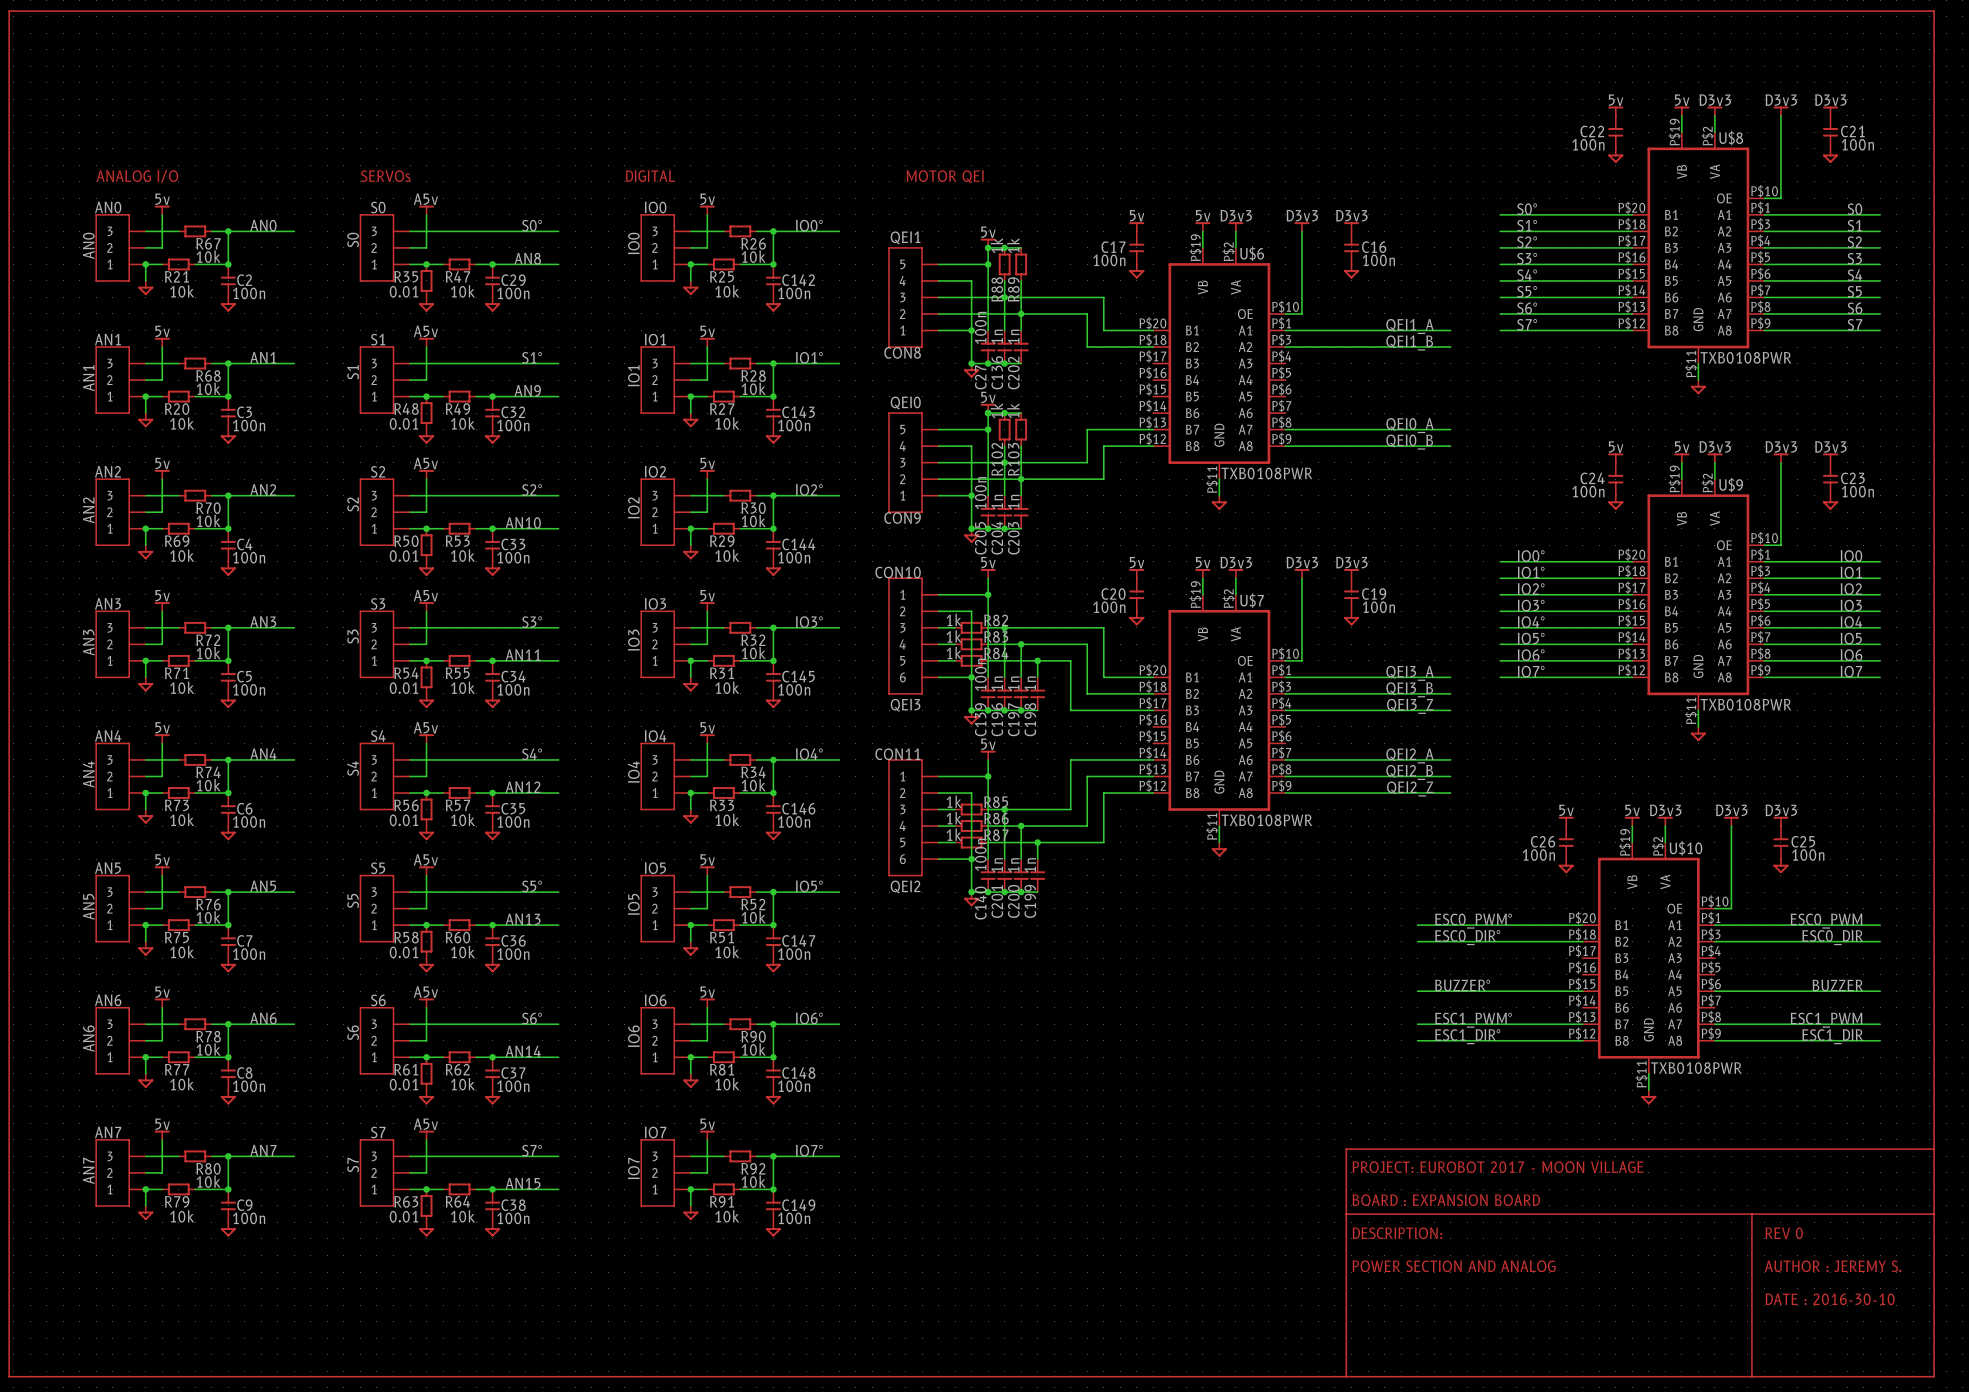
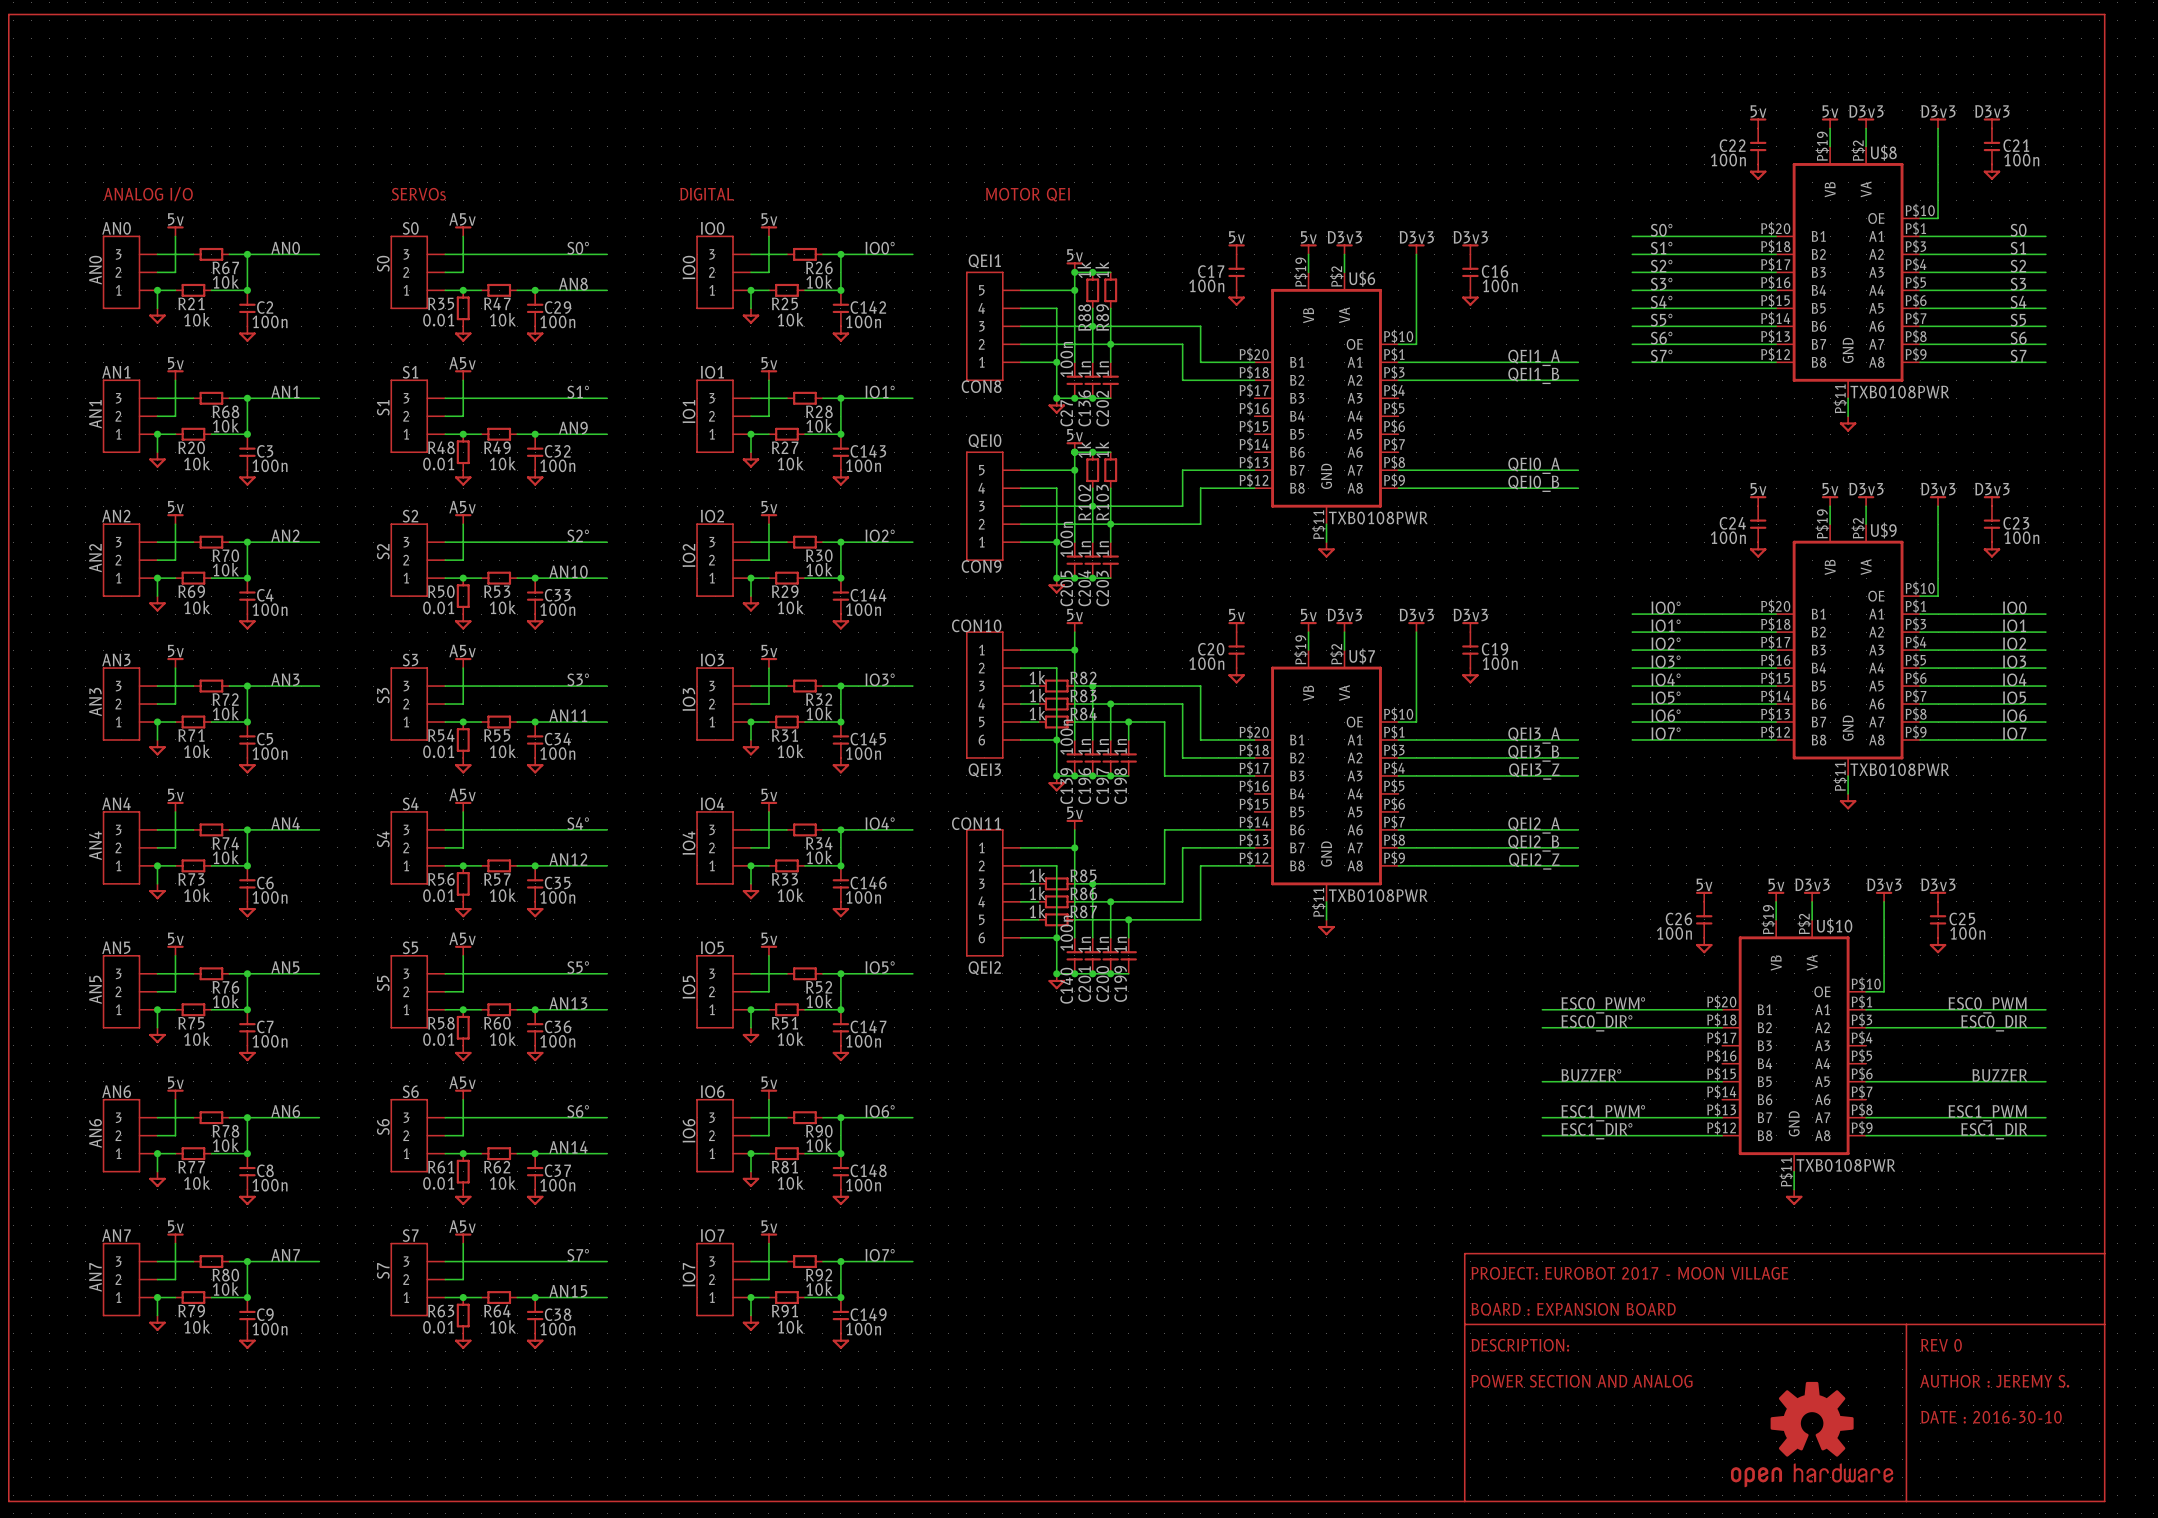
part: none -> (1812, 1434)

